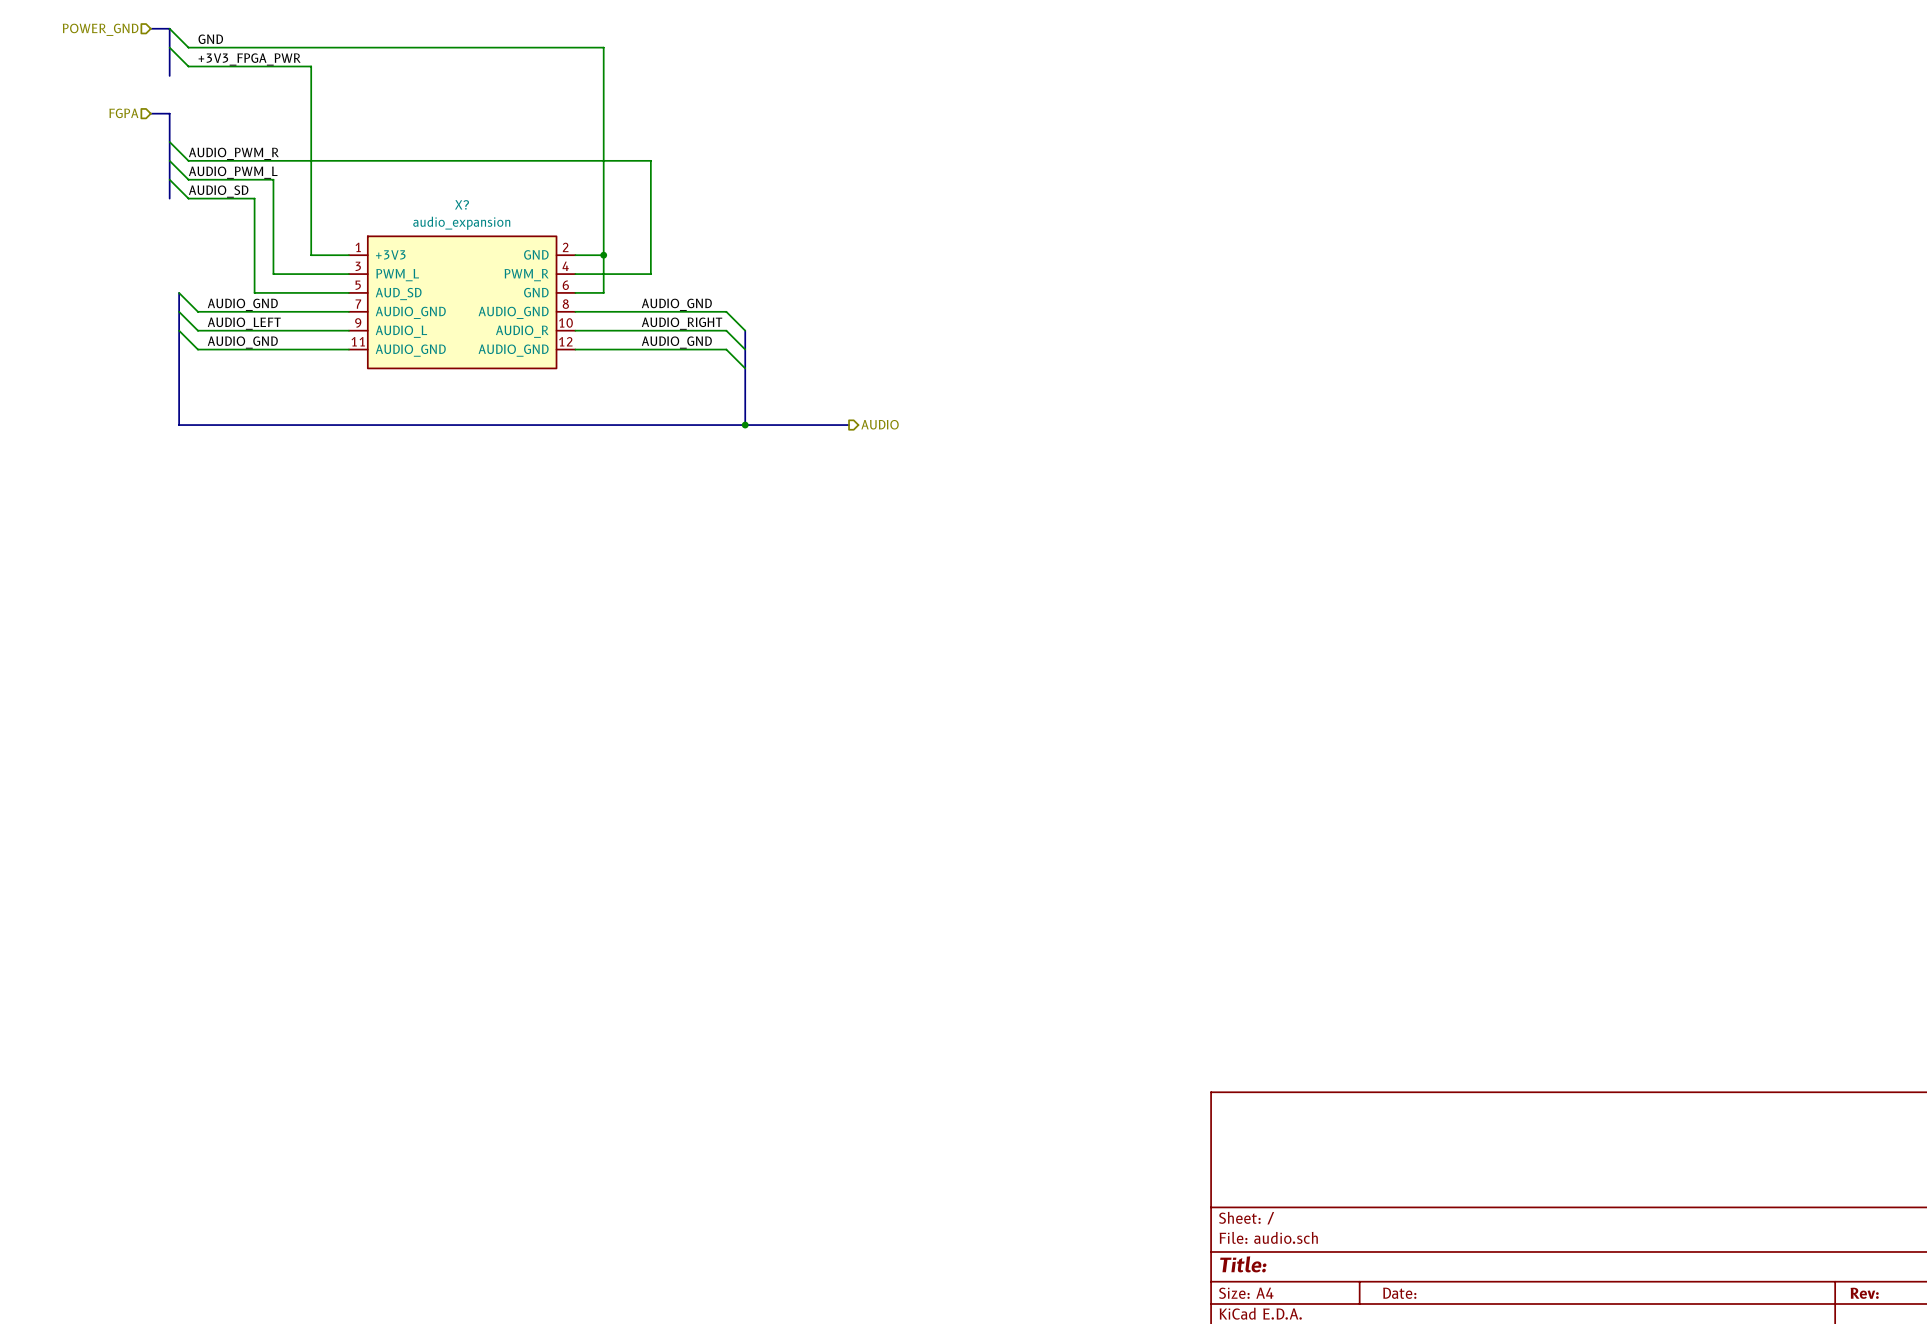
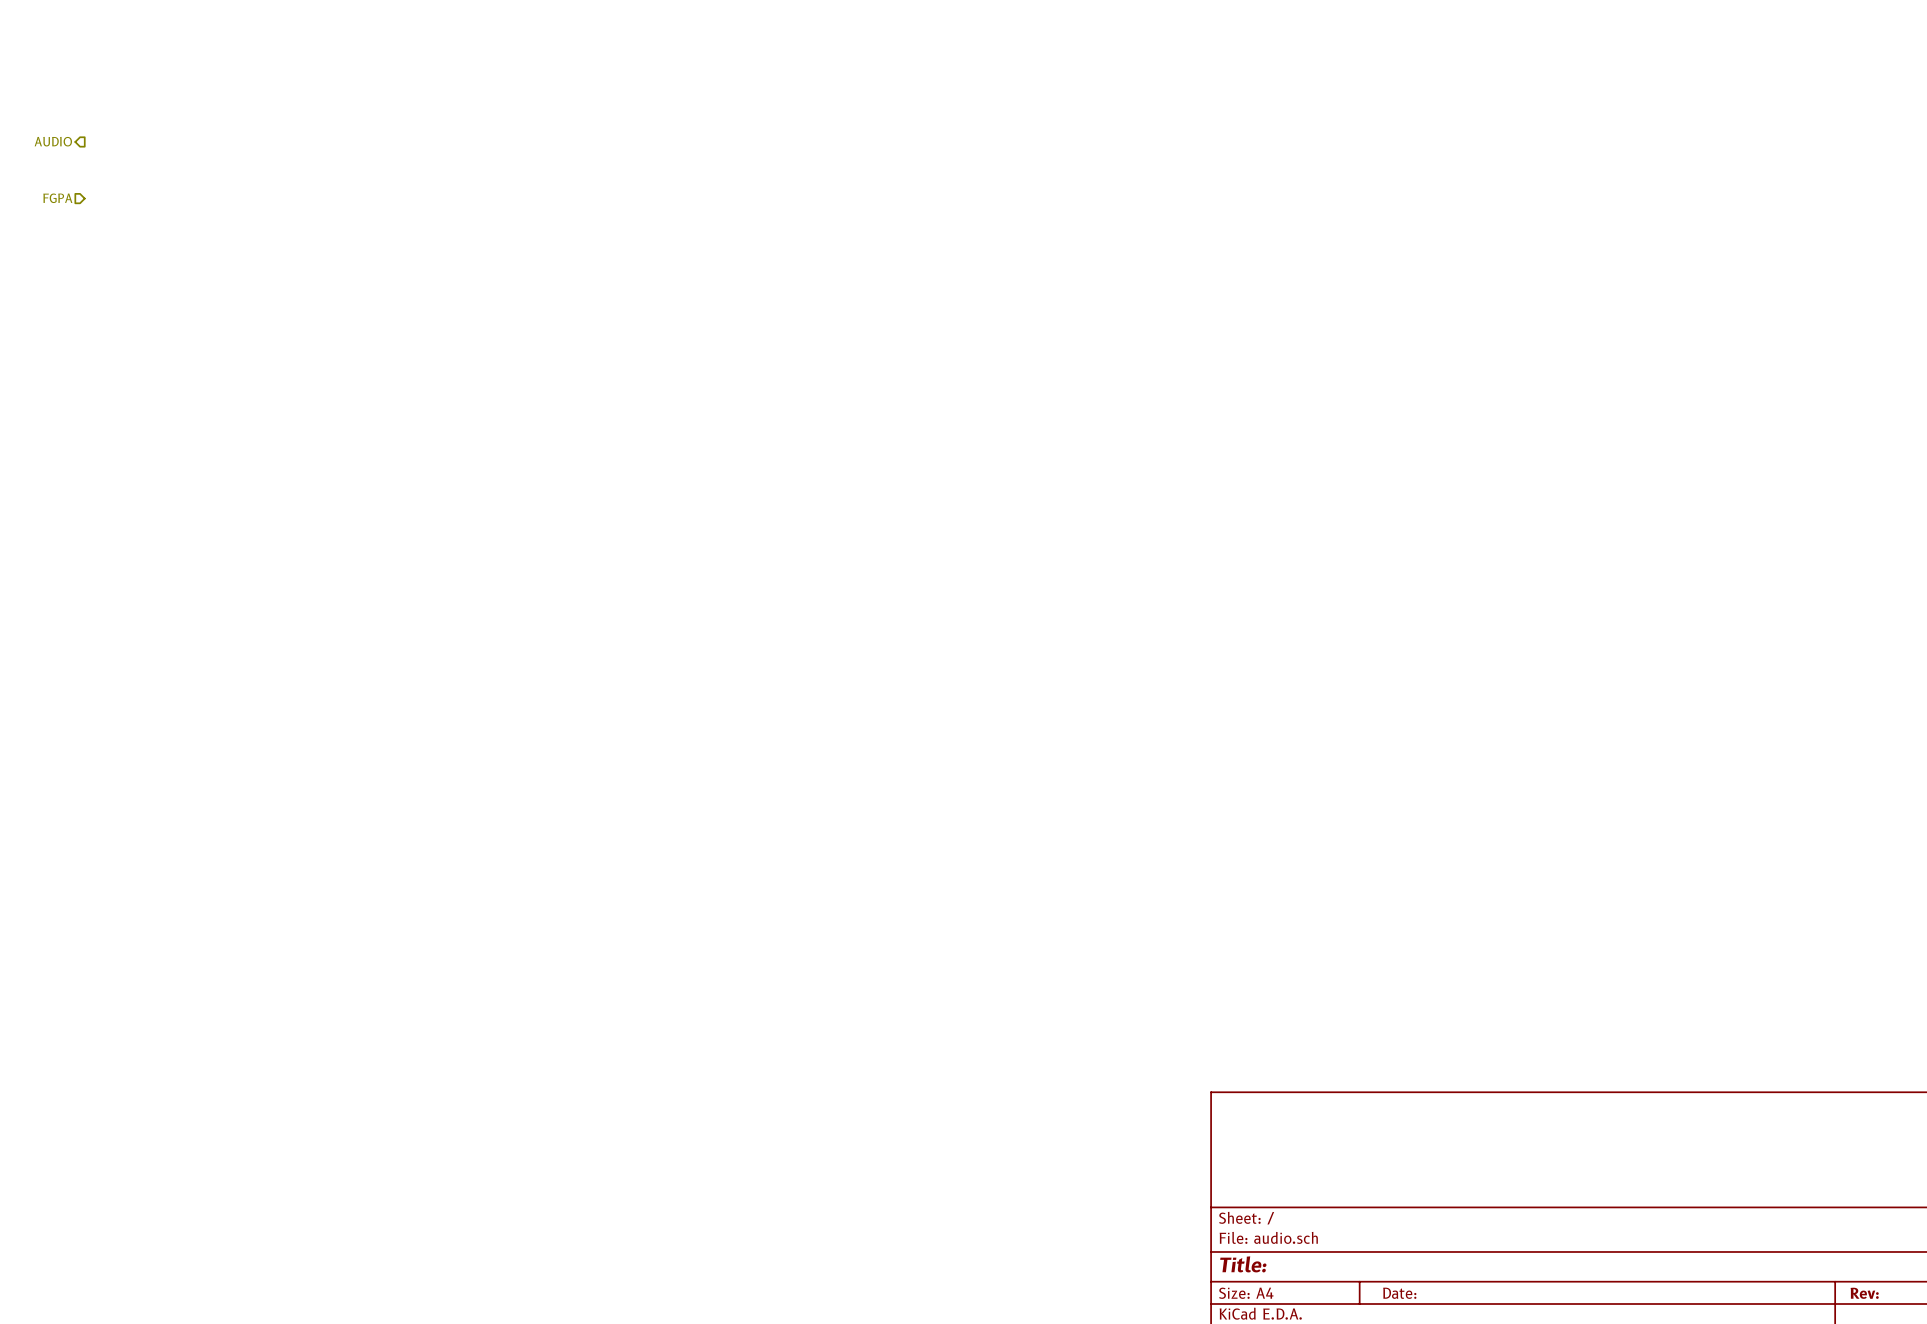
bus: (150, 28) (169, 28) (169, 75) -> none
wire: (169, 28) (188, 47) (603, 47) (603, 292) (575, 292) -> none
hierarchical label: POWER_GND (100, 29) -> none
label: GND (210, 39) -> none
wire: (169, 47) (188, 66) (311, 66) (311, 255) (348, 255) -> none
label: +3V3_FPGA_PWR (249, 59) -> none
hierarchical label position: FGPA (123, 113) -> FGPA (57, 198)
bus: (150, 113) (169, 113) (169, 198) -> none
hierarchical label: none -> AUDIO (53, 141)
wire: (169, 141) (188, 160) (650, 160) (650, 274) (575, 274) -> none
label: AUDIO_PWM_R (233, 153) -> none
wire: (169, 160) (188, 179) (273, 179) (273, 274) (348, 274) -> none
label: AUDIO_PWM_L (233, 172) -> none
wire: (169, 179) (188, 198) (254, 198) (254, 292) (348, 292) -> none
label: AUDIO_SD (218, 191) -> none
wire: (575, 255) (603, 255) -> none
junction: (603, 255) -> none
bus: (179, 292) (179, 425) (849, 425) -> none
wire: (179, 292) (197, 311) (348, 311) -> none
X?: audio_expansion (462, 302) -> none
label: AUDIO_GND (242, 304) -> none
label: AUDIO_GND (676, 304) -> none
wire: (179, 311) (197, 330) (348, 330) -> none
wire: (575, 311) (726, 311) (745, 330) -> none
label: AUDIO_LEFT (244, 323) -> none
label: AUDIO_RIGHT (682, 323) -> none
wire: (179, 330) (197, 349) (348, 349) -> none
wire: (575, 330) (726, 330) (745, 349) -> none
bus: (745, 330) (745, 425) -> none
label: AUDIO_GND (242, 342) -> none
label: AUDIO_GND (676, 342) -> none
wire: (575, 349) (726, 349) (745, 368) -> none
hierarchical label: AUDIO (880, 424) -> none
junction: (745, 425) -> none

